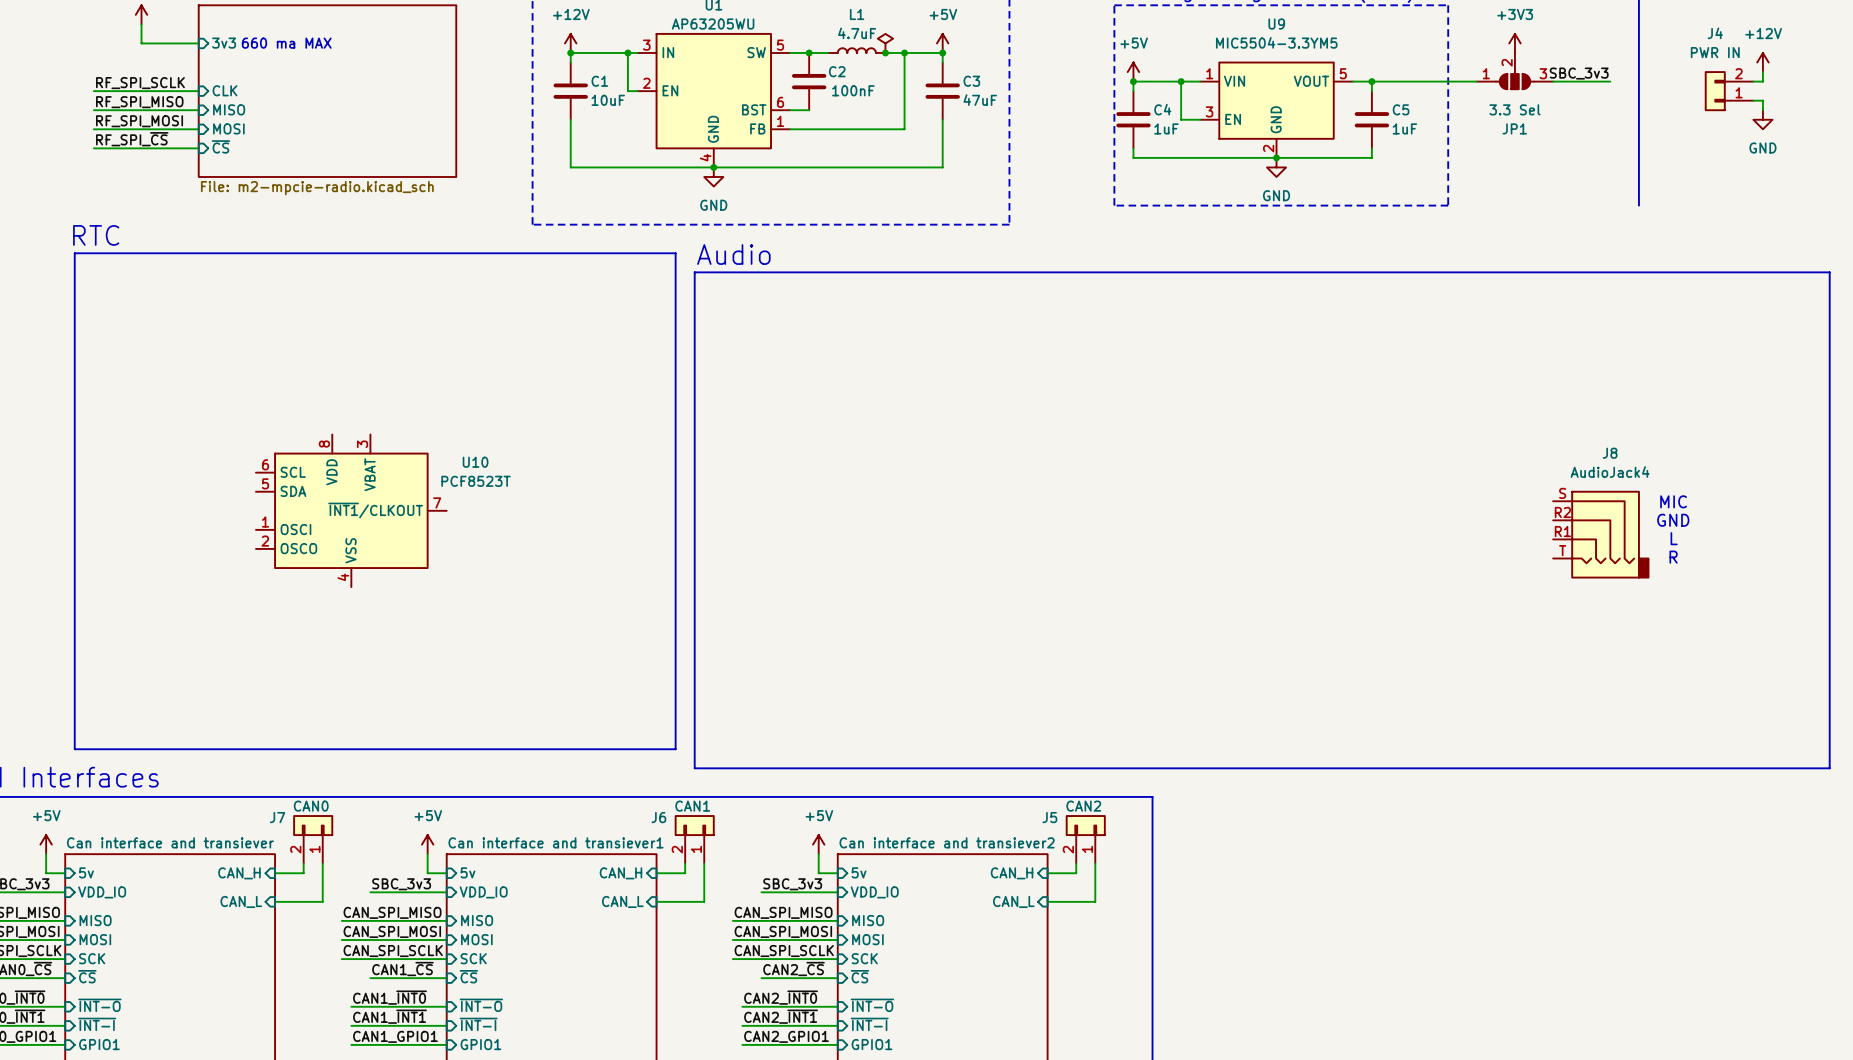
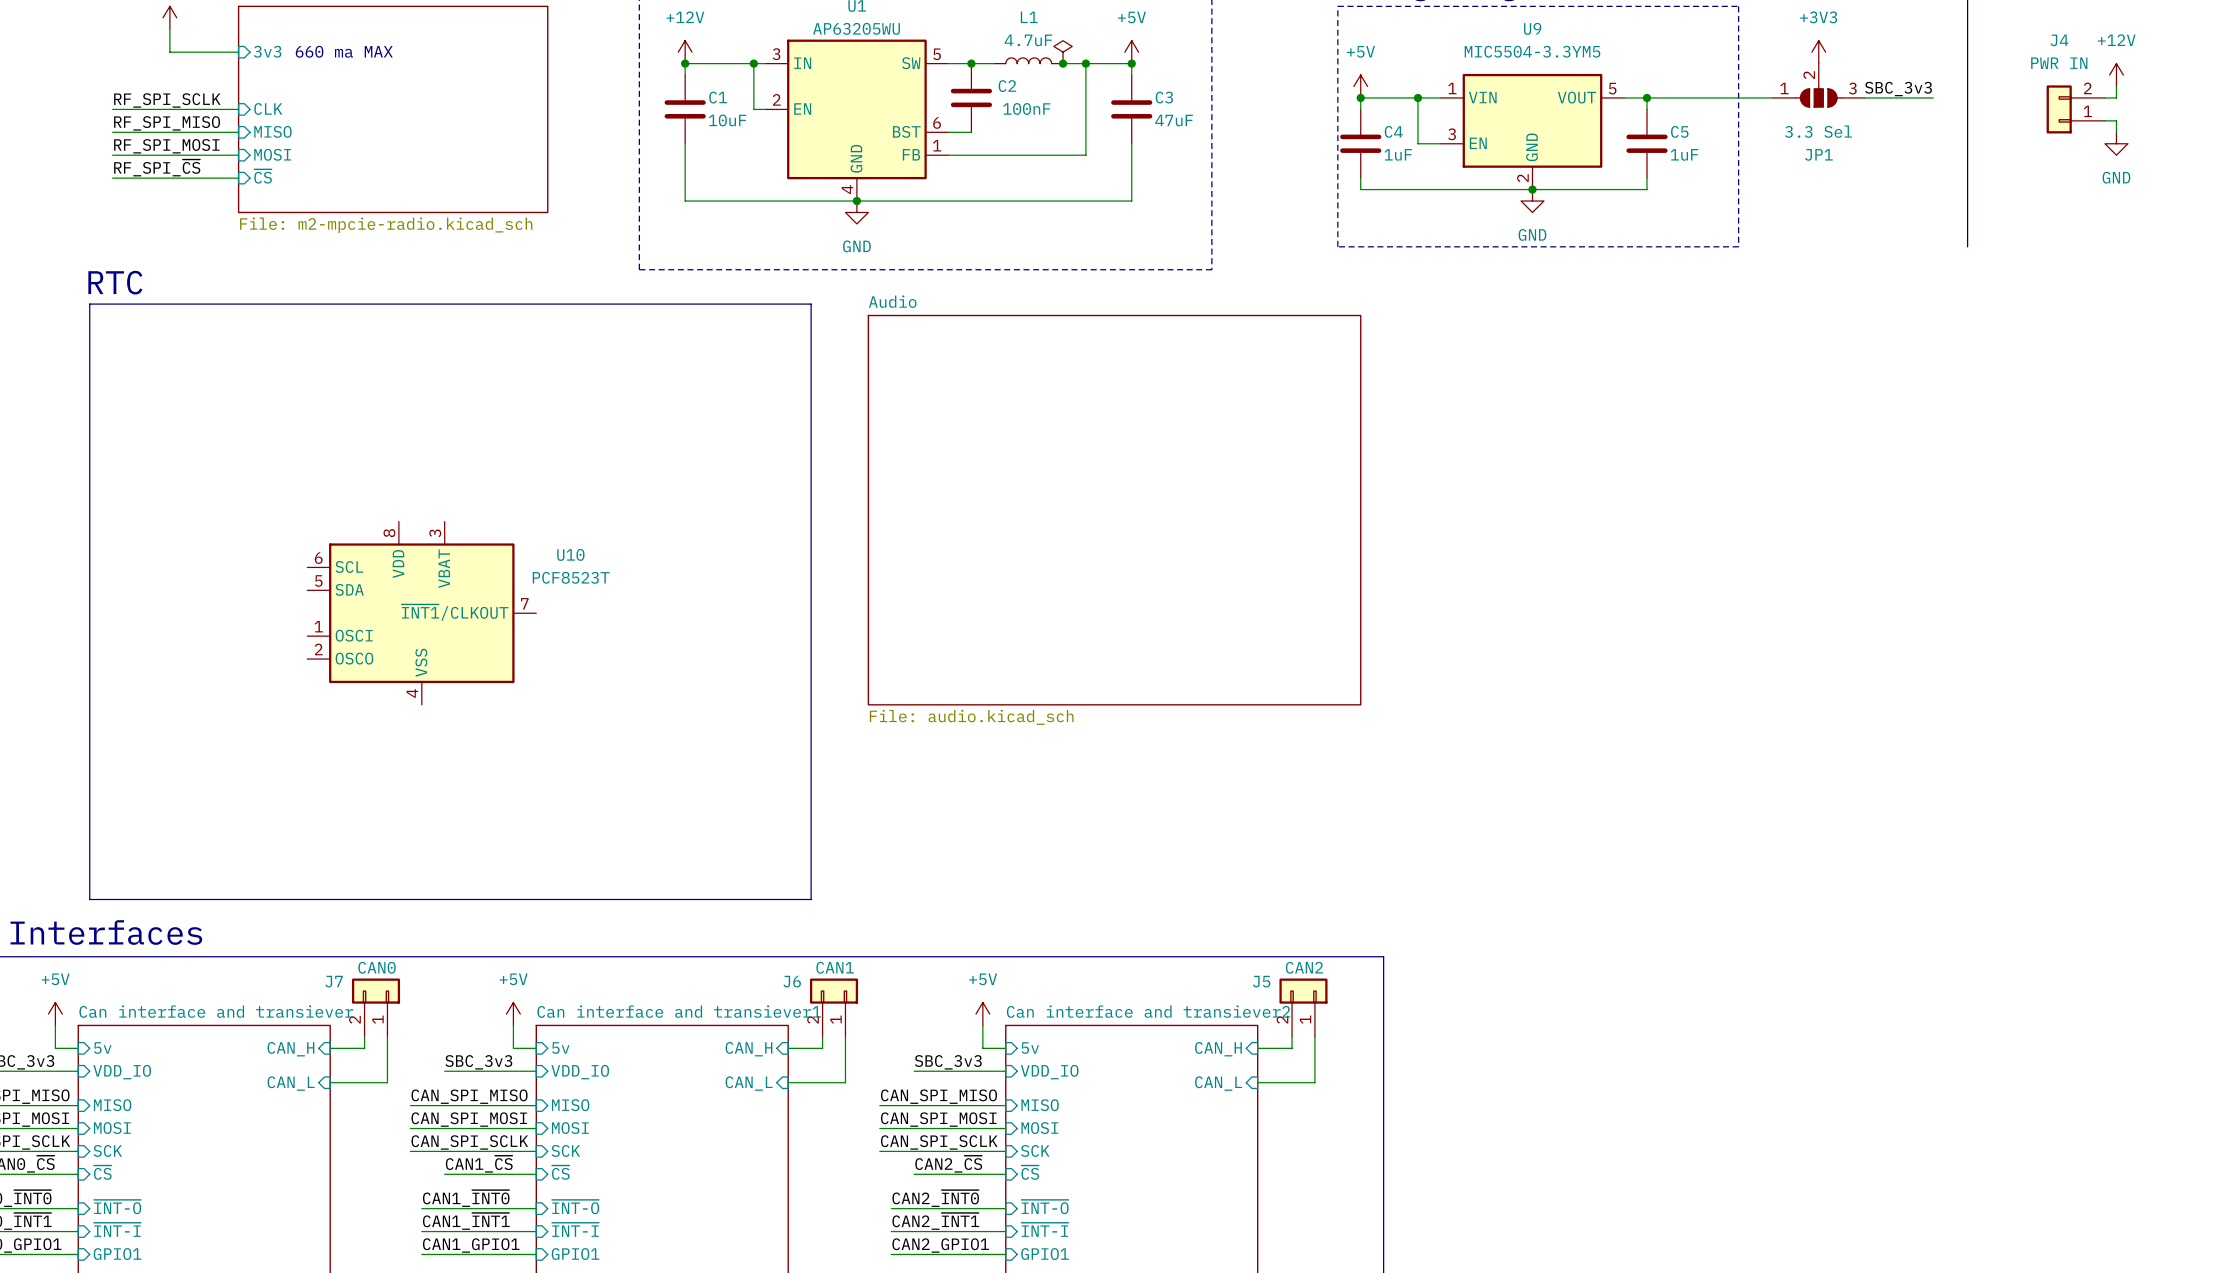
text: Audio (733, 254) -> none
line: (694, 272) (1829, 272) (1829, 768) (694, 768) (694, 272) -> none
sheet Audio: none -> File: audio.kicad_sch (1114, 510)
text: MIC (1673, 501) -> none
text: GND (1673, 520) -> none
J8: AudioJack4 (1601, 534) -> none
text: L (1674, 538) -> none
text: R (1673, 557) -> none

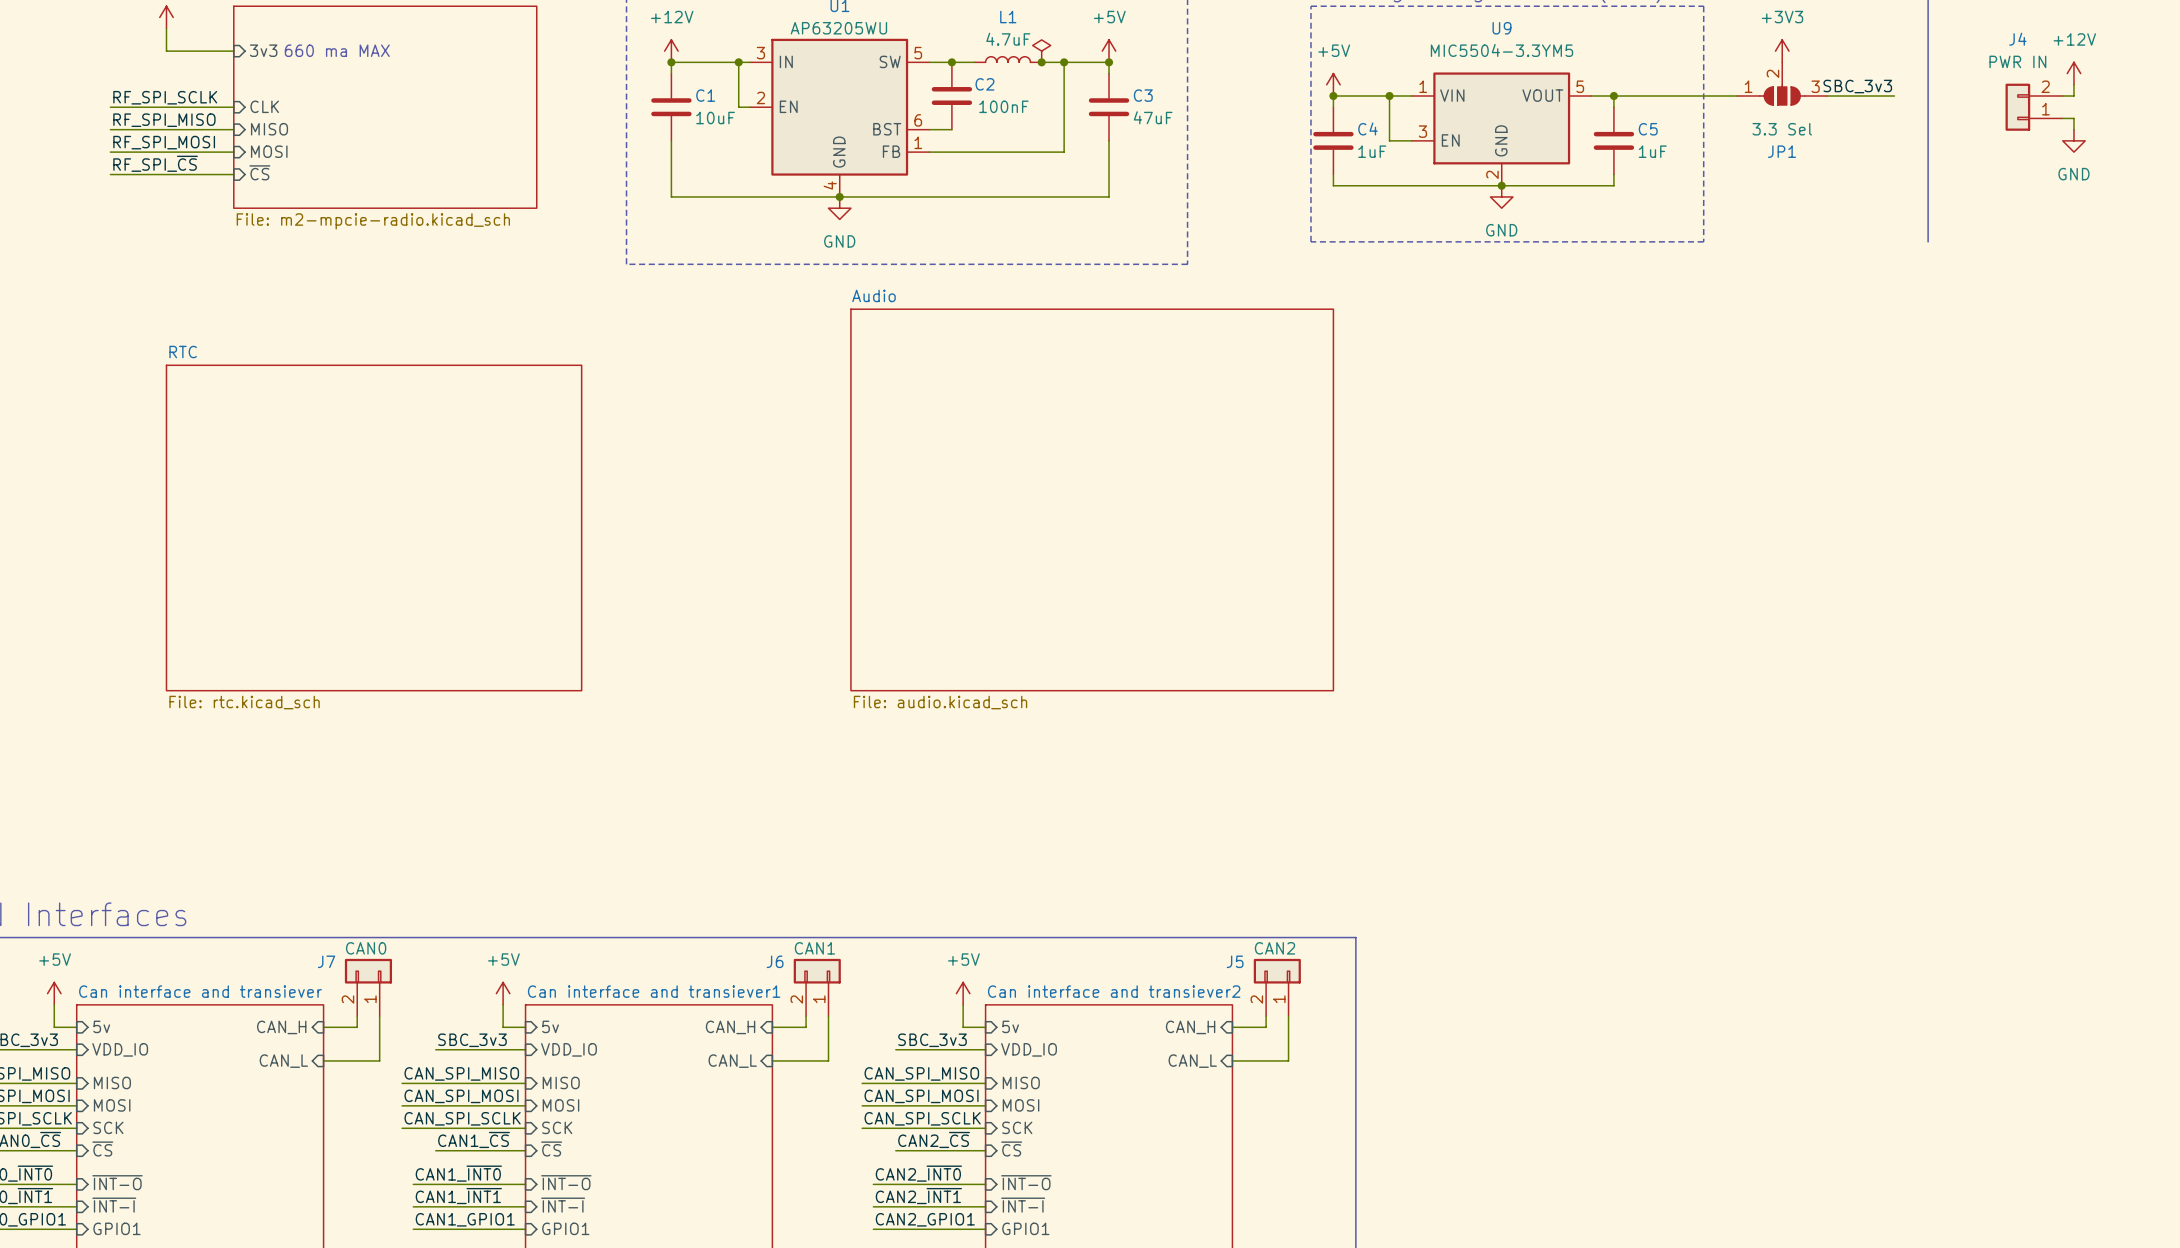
text: RTC (115, 282) -> none
line: (89, 304) (811, 304) (811, 899) (89, 899) (89, 304) -> none
sheet RTC: none -> File: rtc.kicad_sch (374, 527)
U10: PCF8523T (421, 613) -> none

